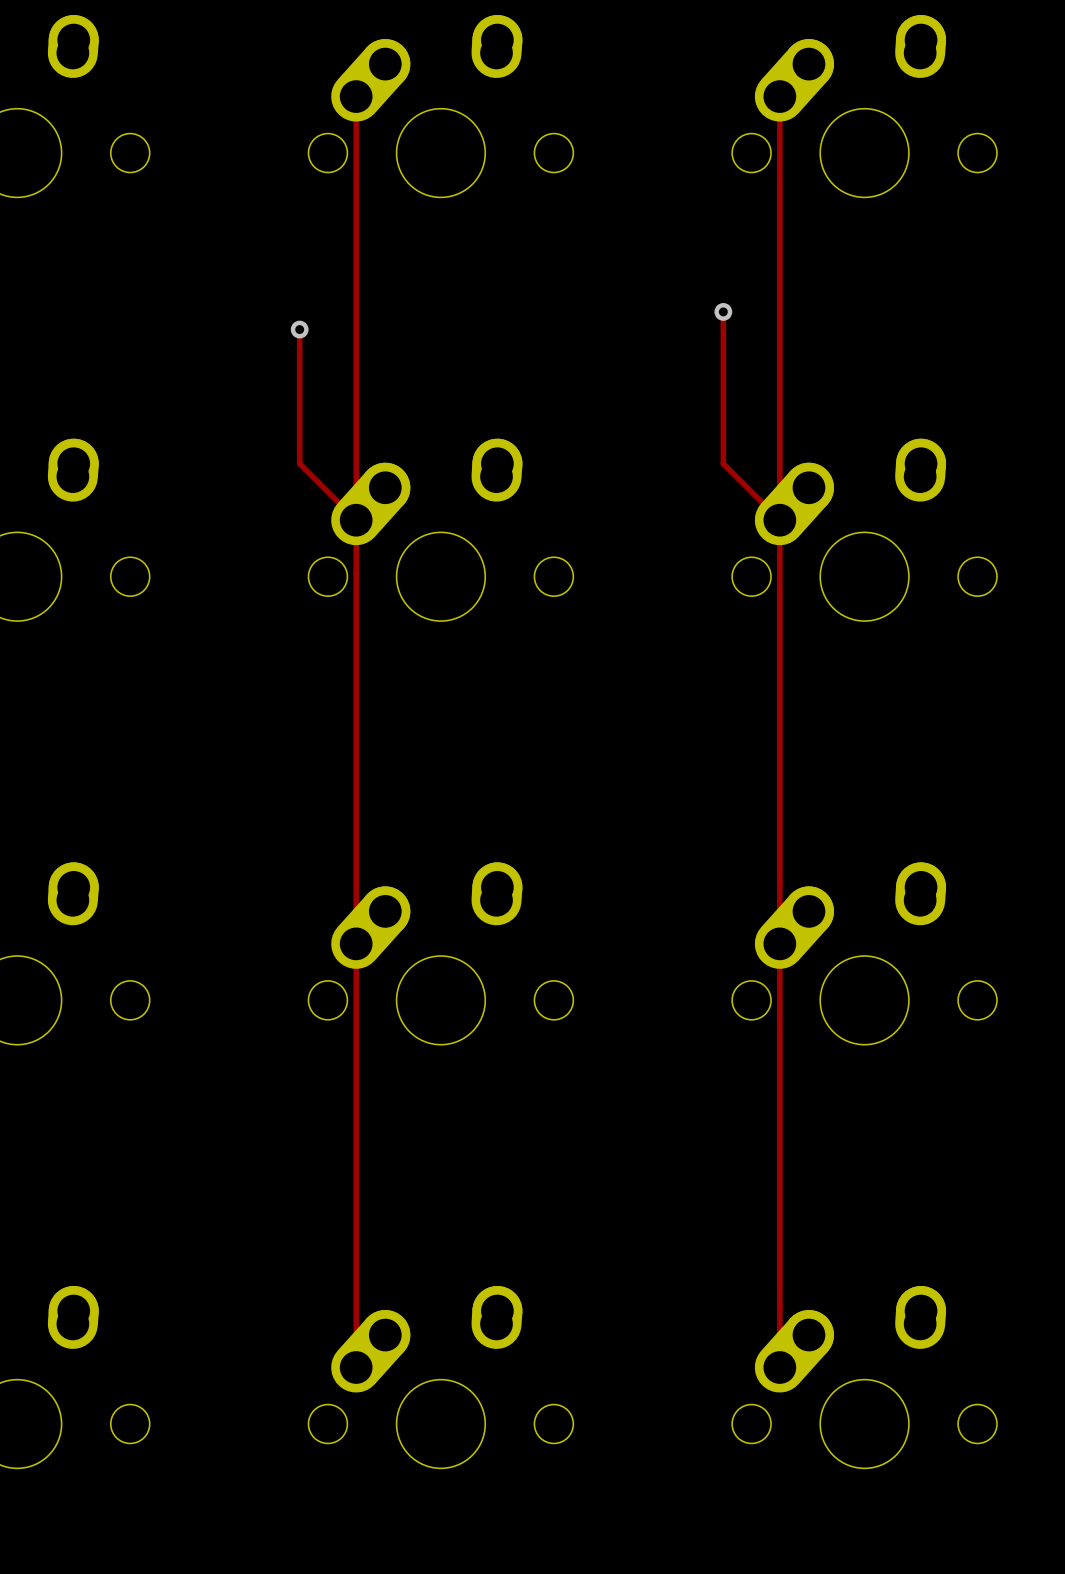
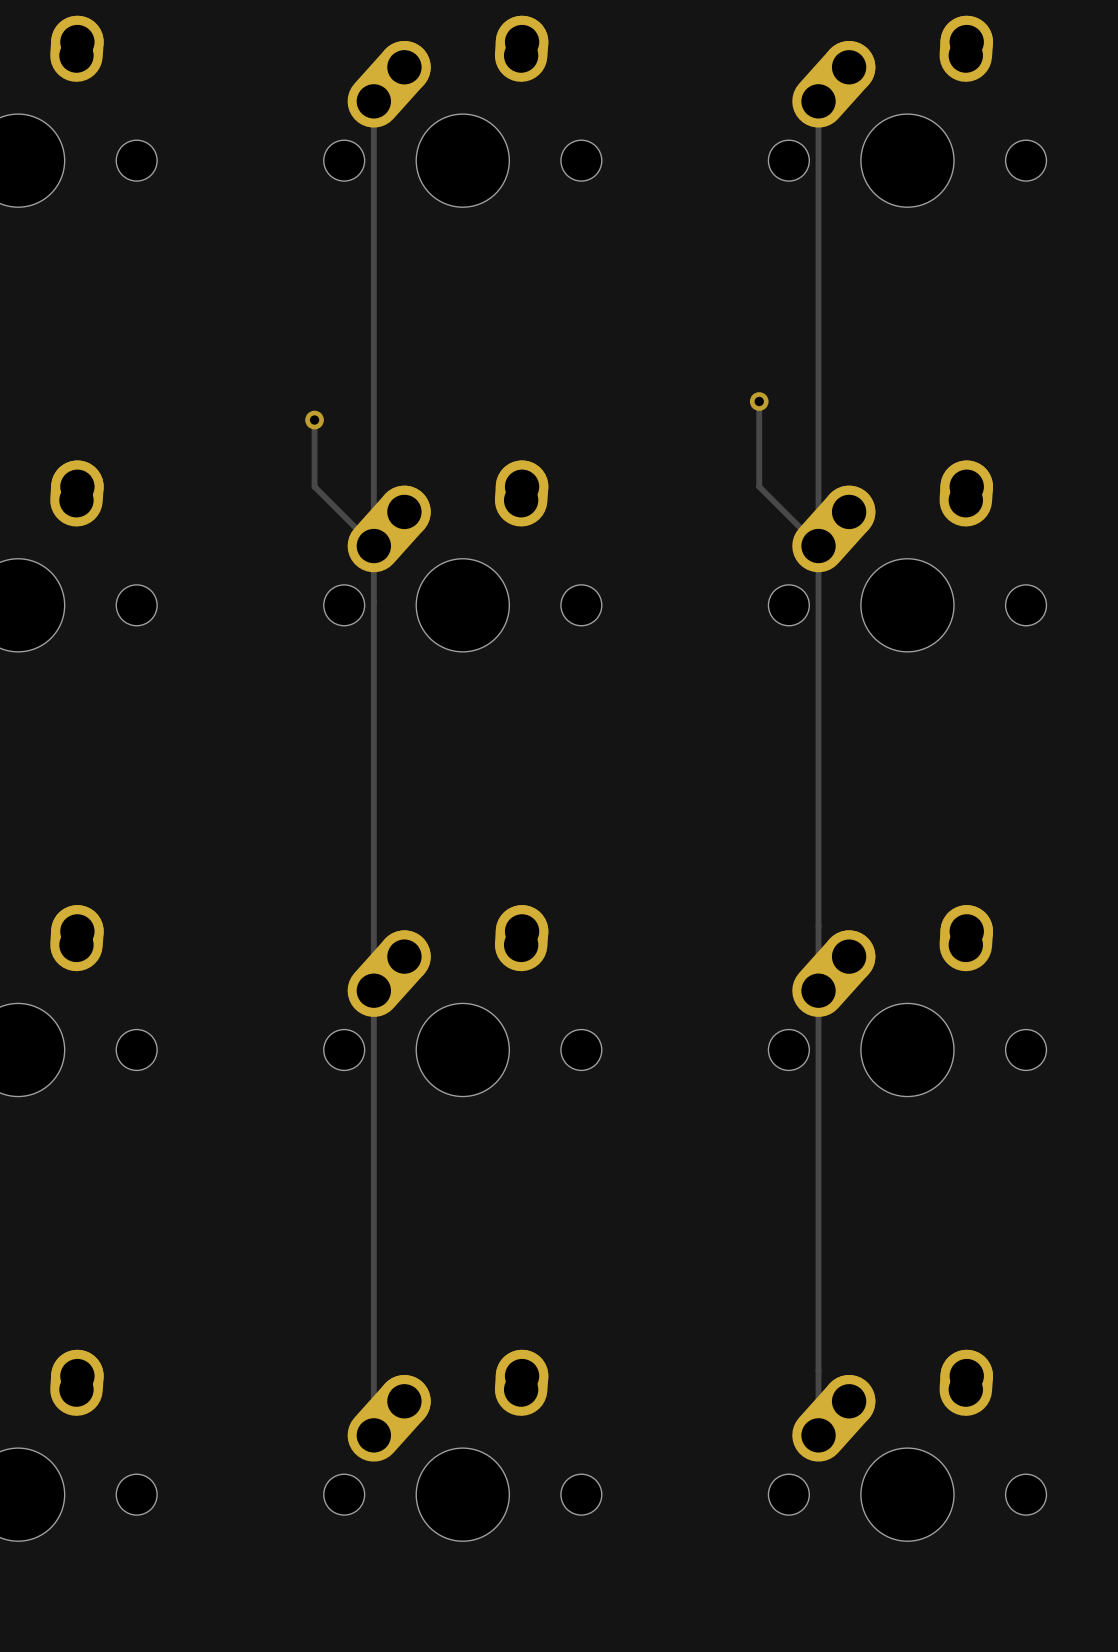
track: (723, 311) (723, 382) -> none
via position: (723, 311) -> (759, 401)
track: (299, 329) (299, 400) -> none
via position: (299, 329) -> (314, 420)

